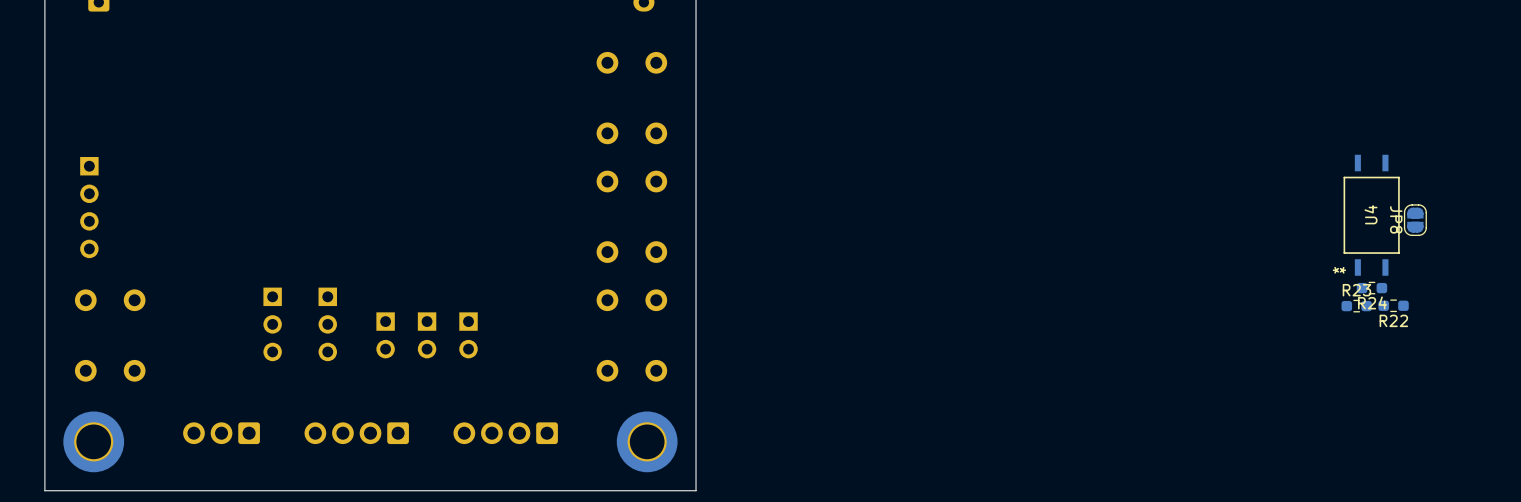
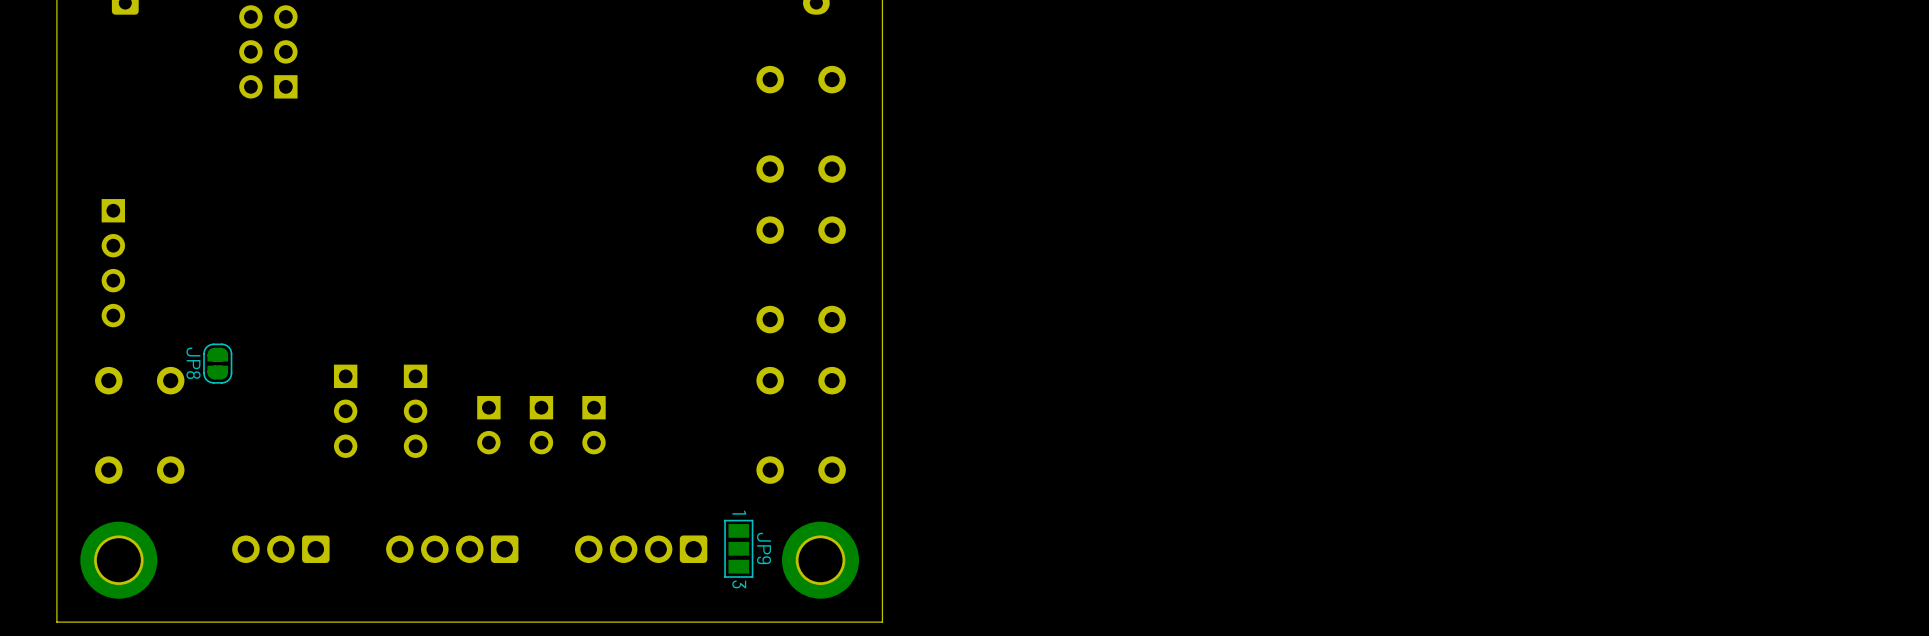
part: none -> (268, 51)
U4: (1371, 215) -> none
JP8 position: (1415, 220) -> (217, 363)
R24: (1371, 288) -> none
R22: (1393, 305) -> none
R23: (1356, 306) -> none
JP9: none -> (738, 548)

